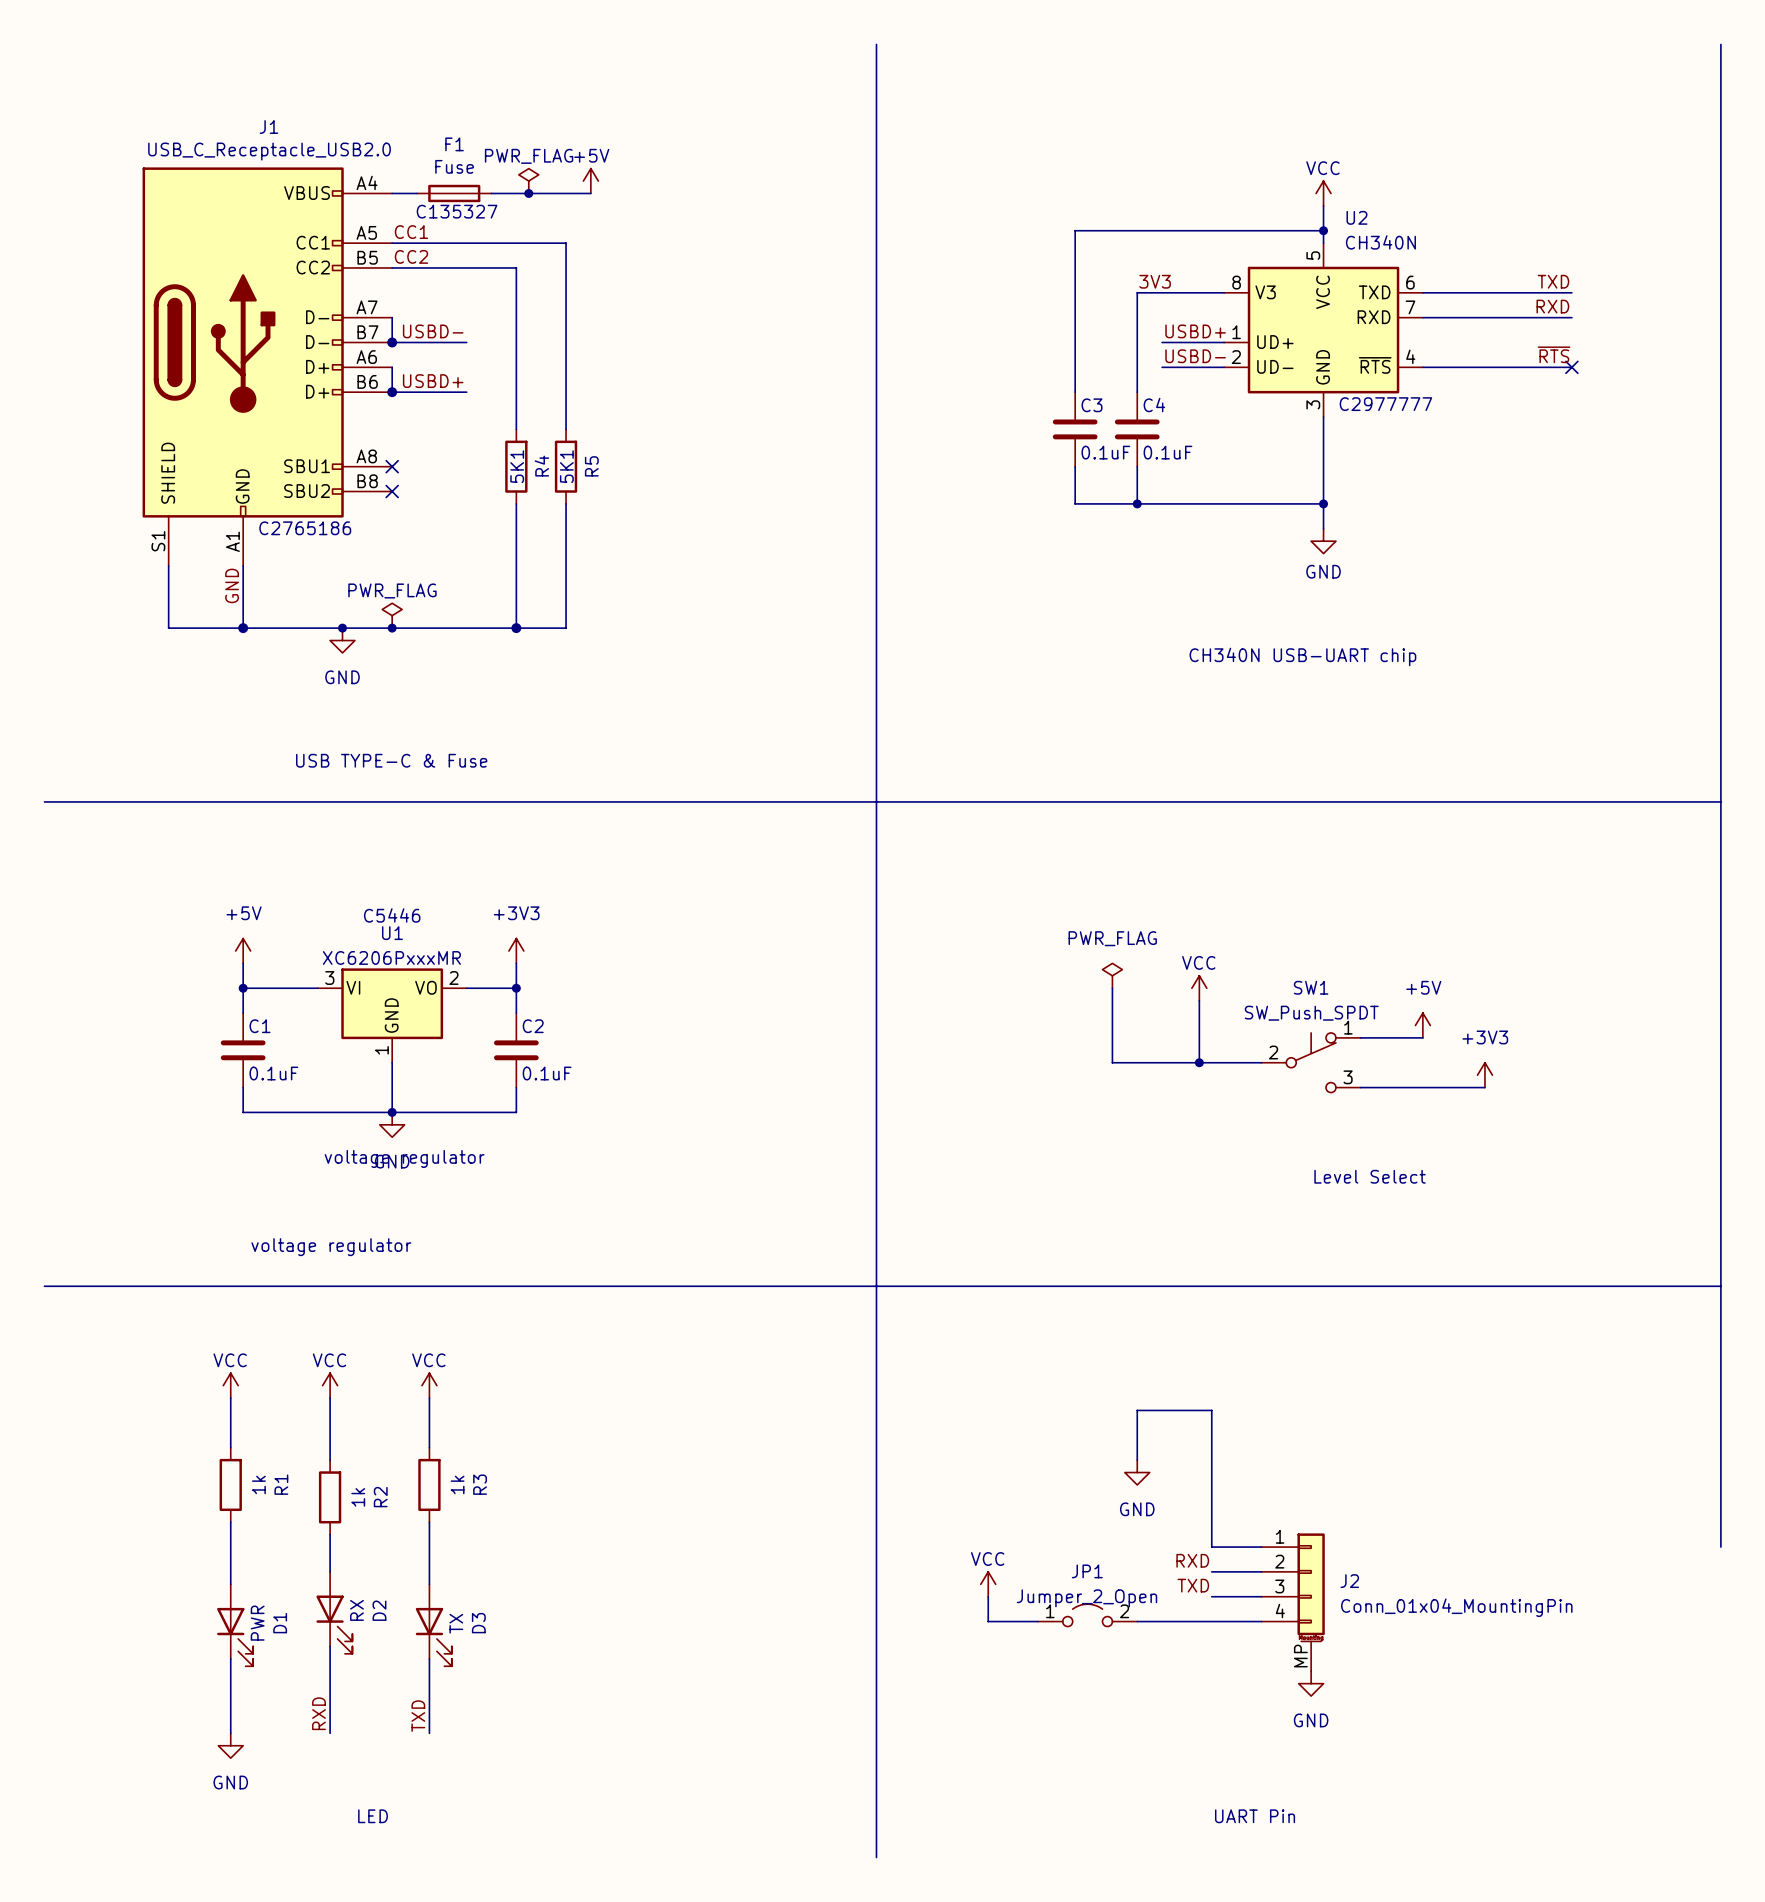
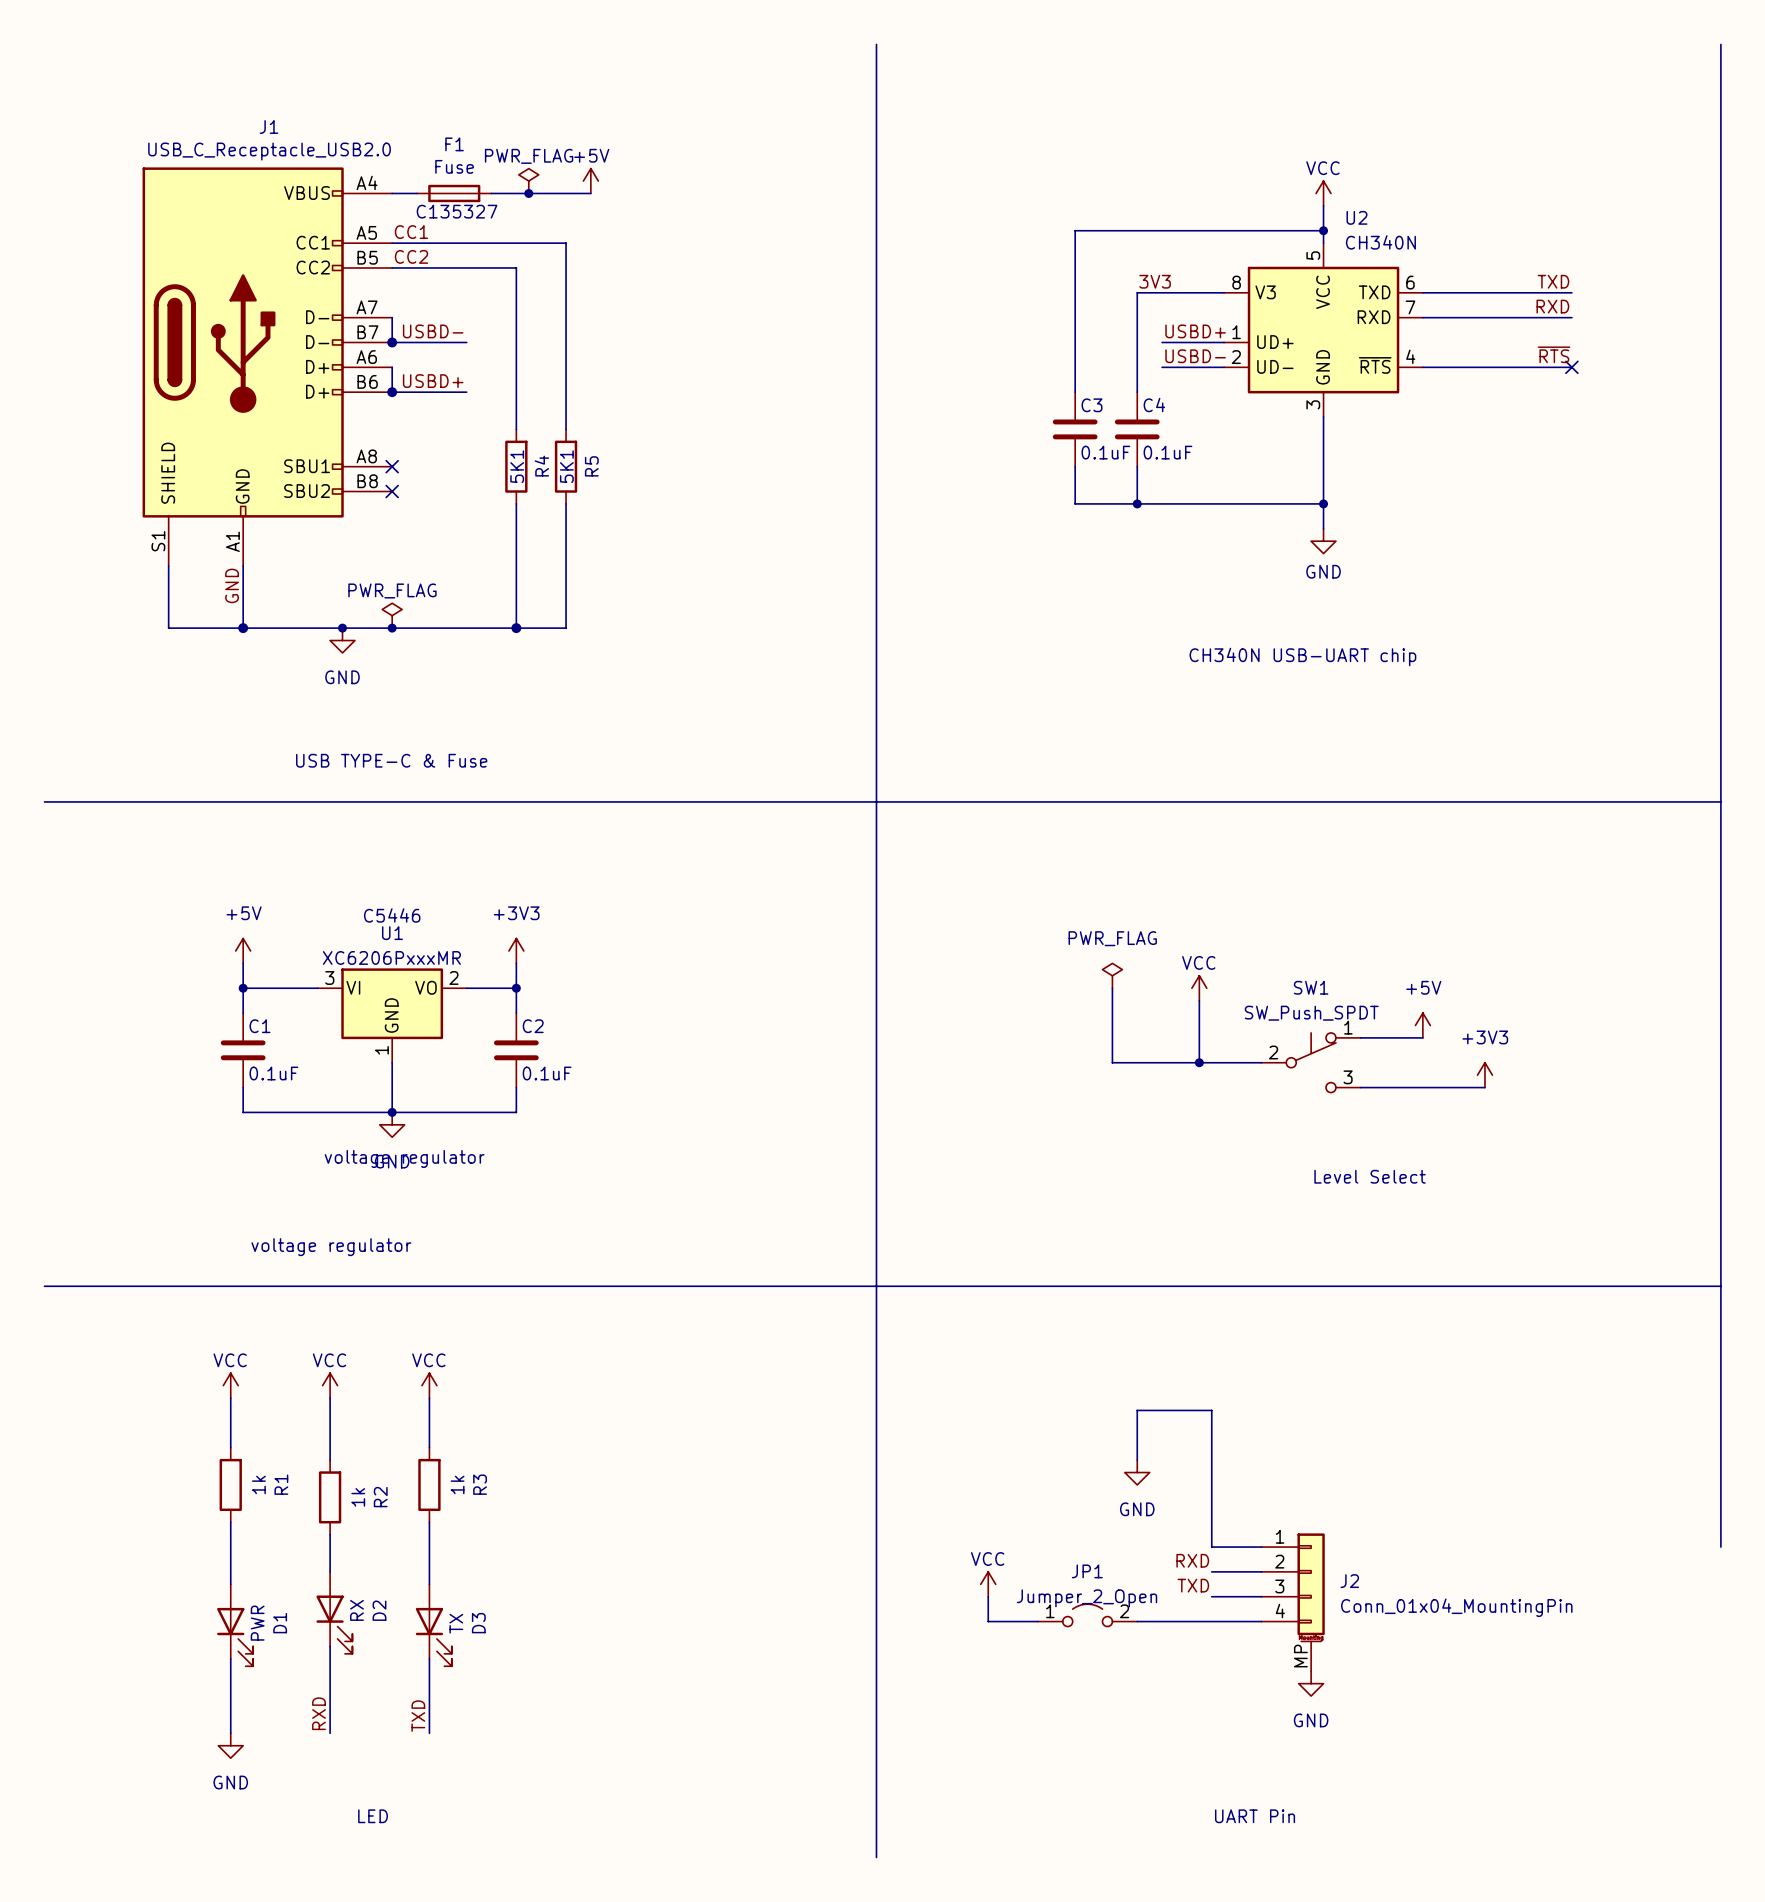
U2 text: C2977777 (1385, 404) -> none
J1 text: C2765186 (305, 528) -> none

